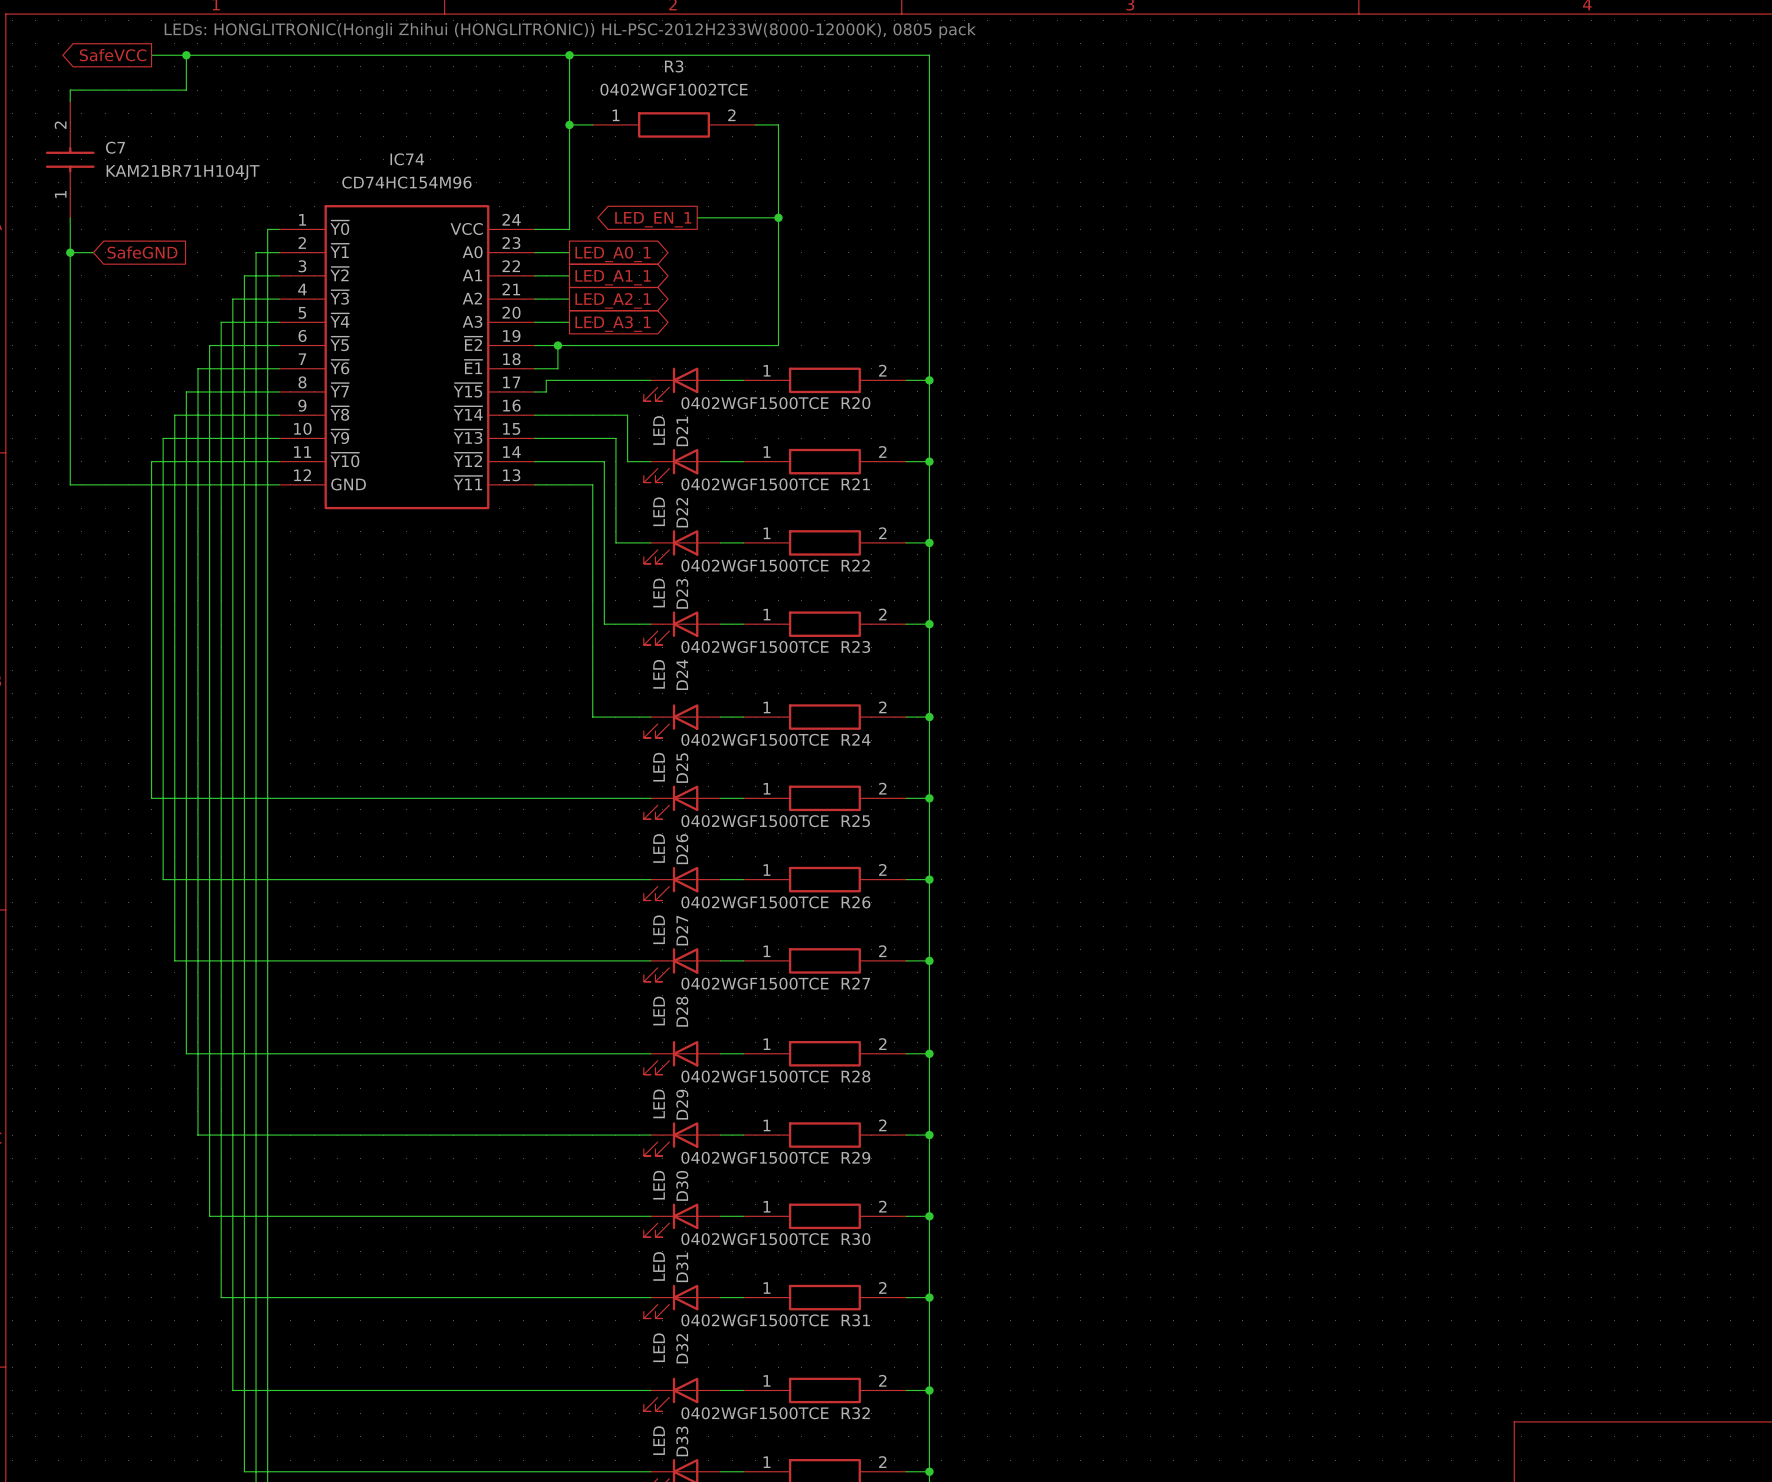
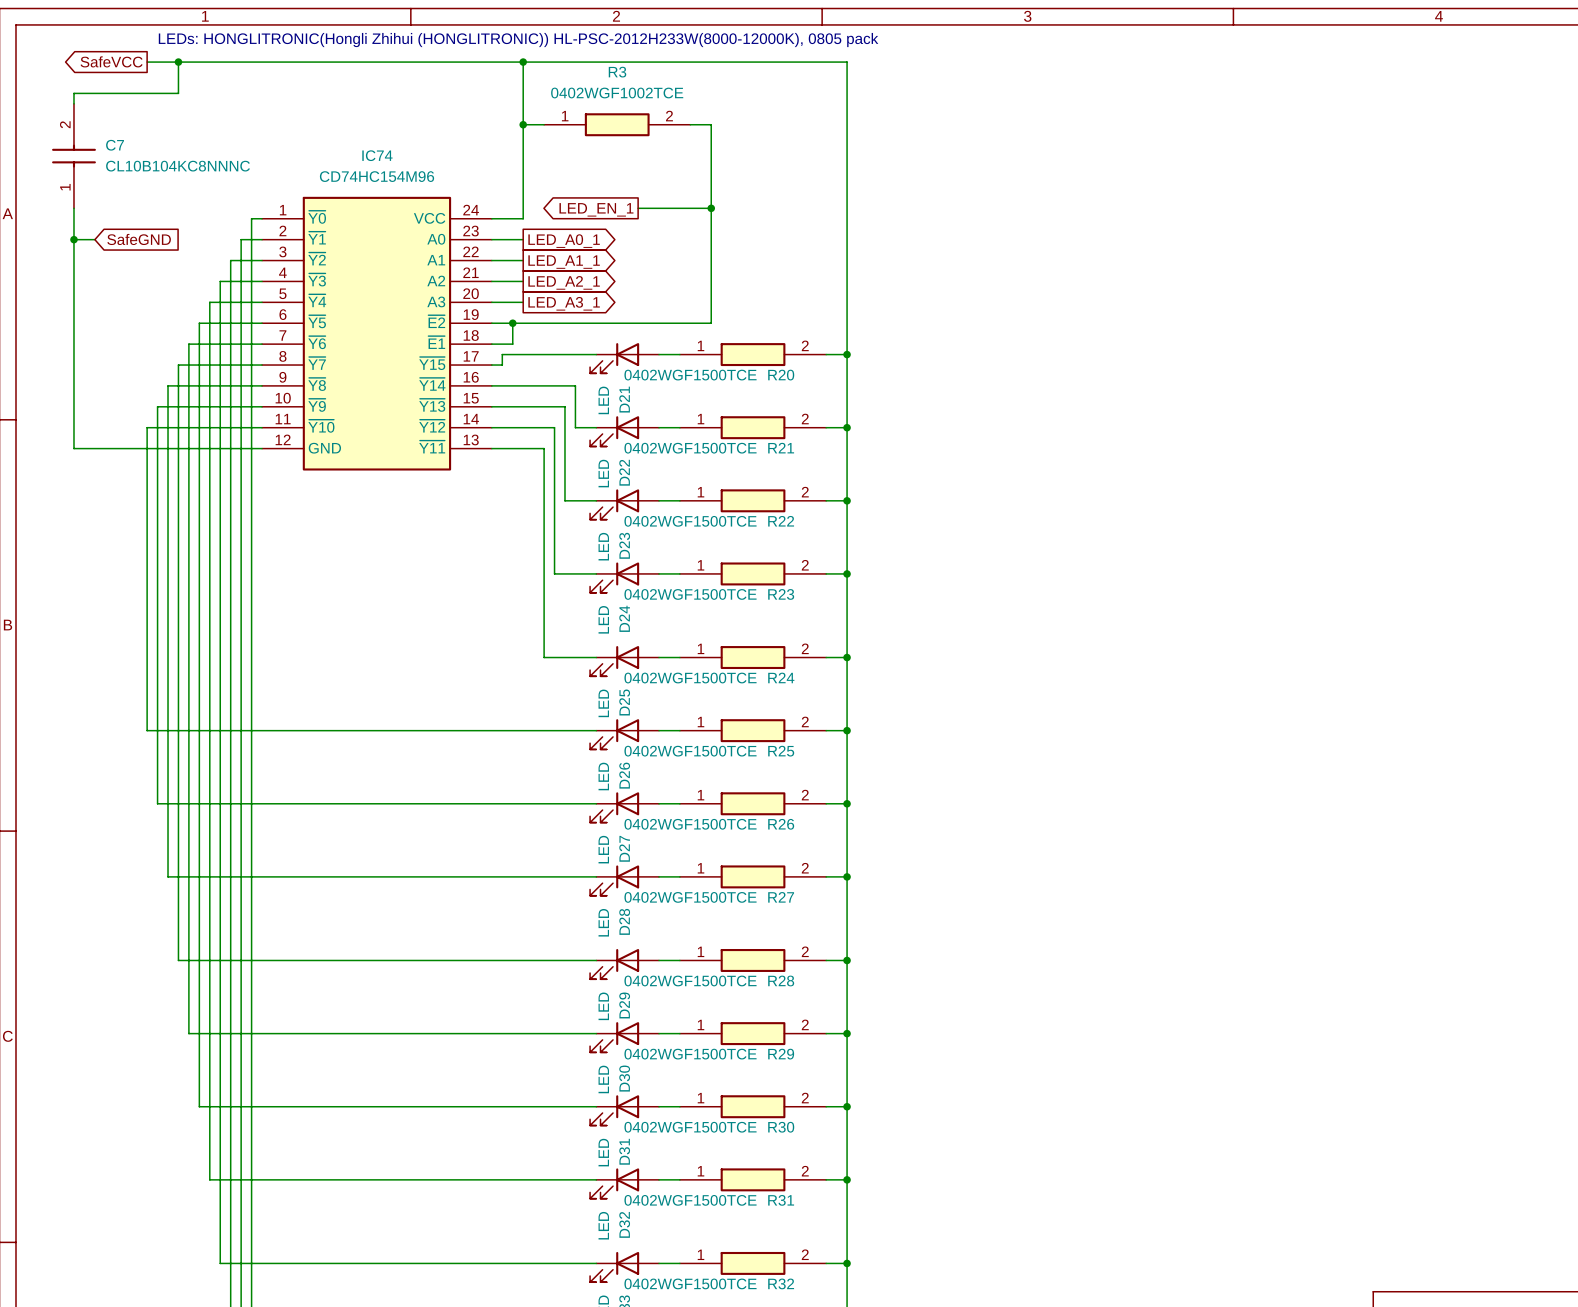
C7 value: KAM21BR71H104JT (183, 172) -> CL10B104KC8NNNC (178, 166)

